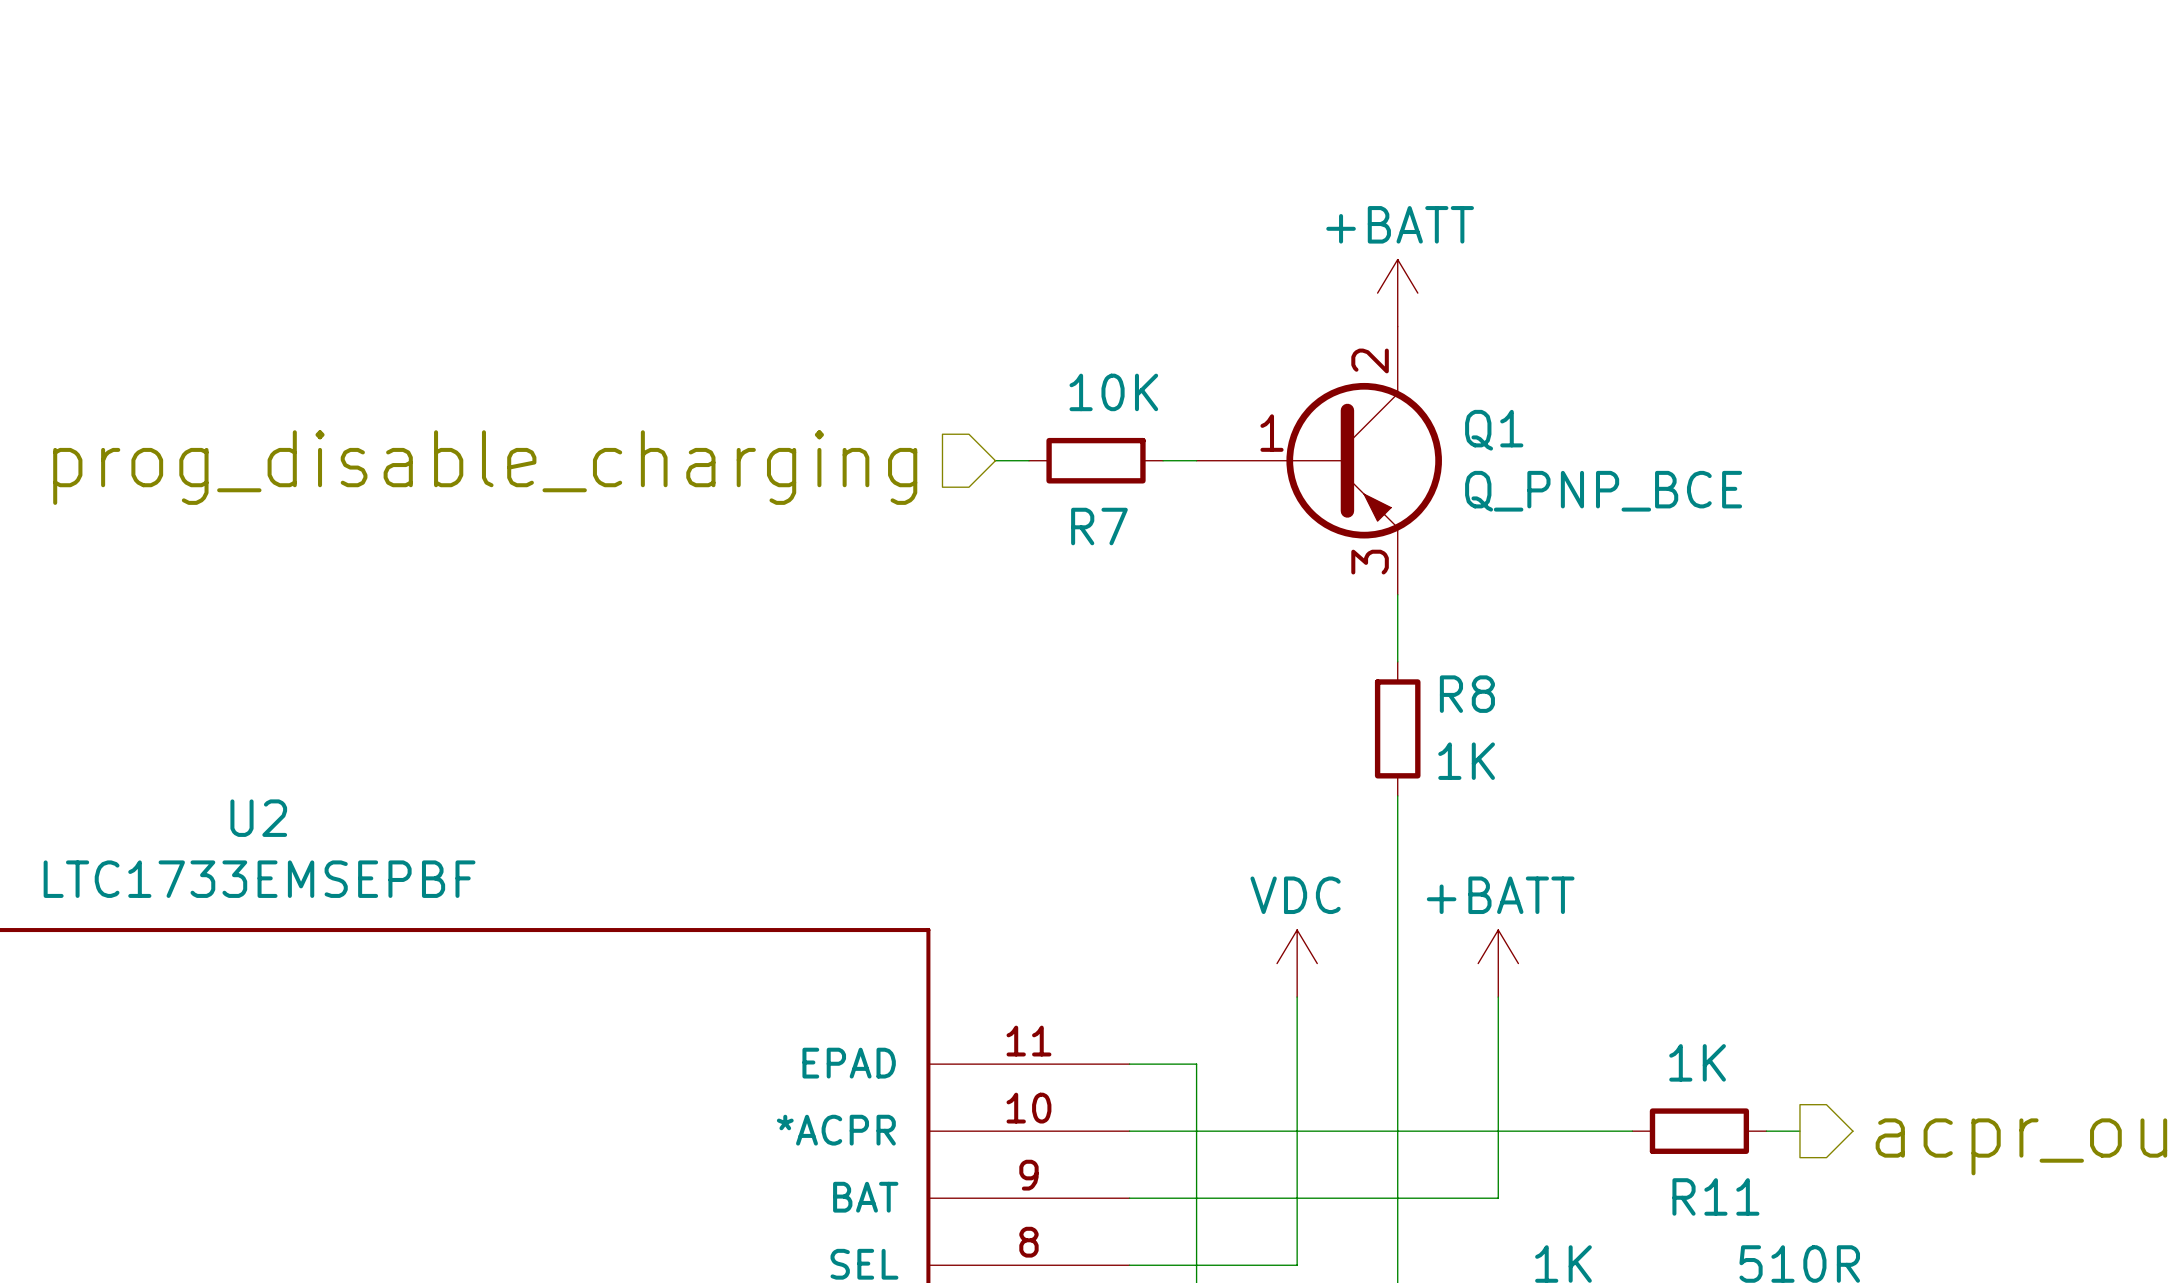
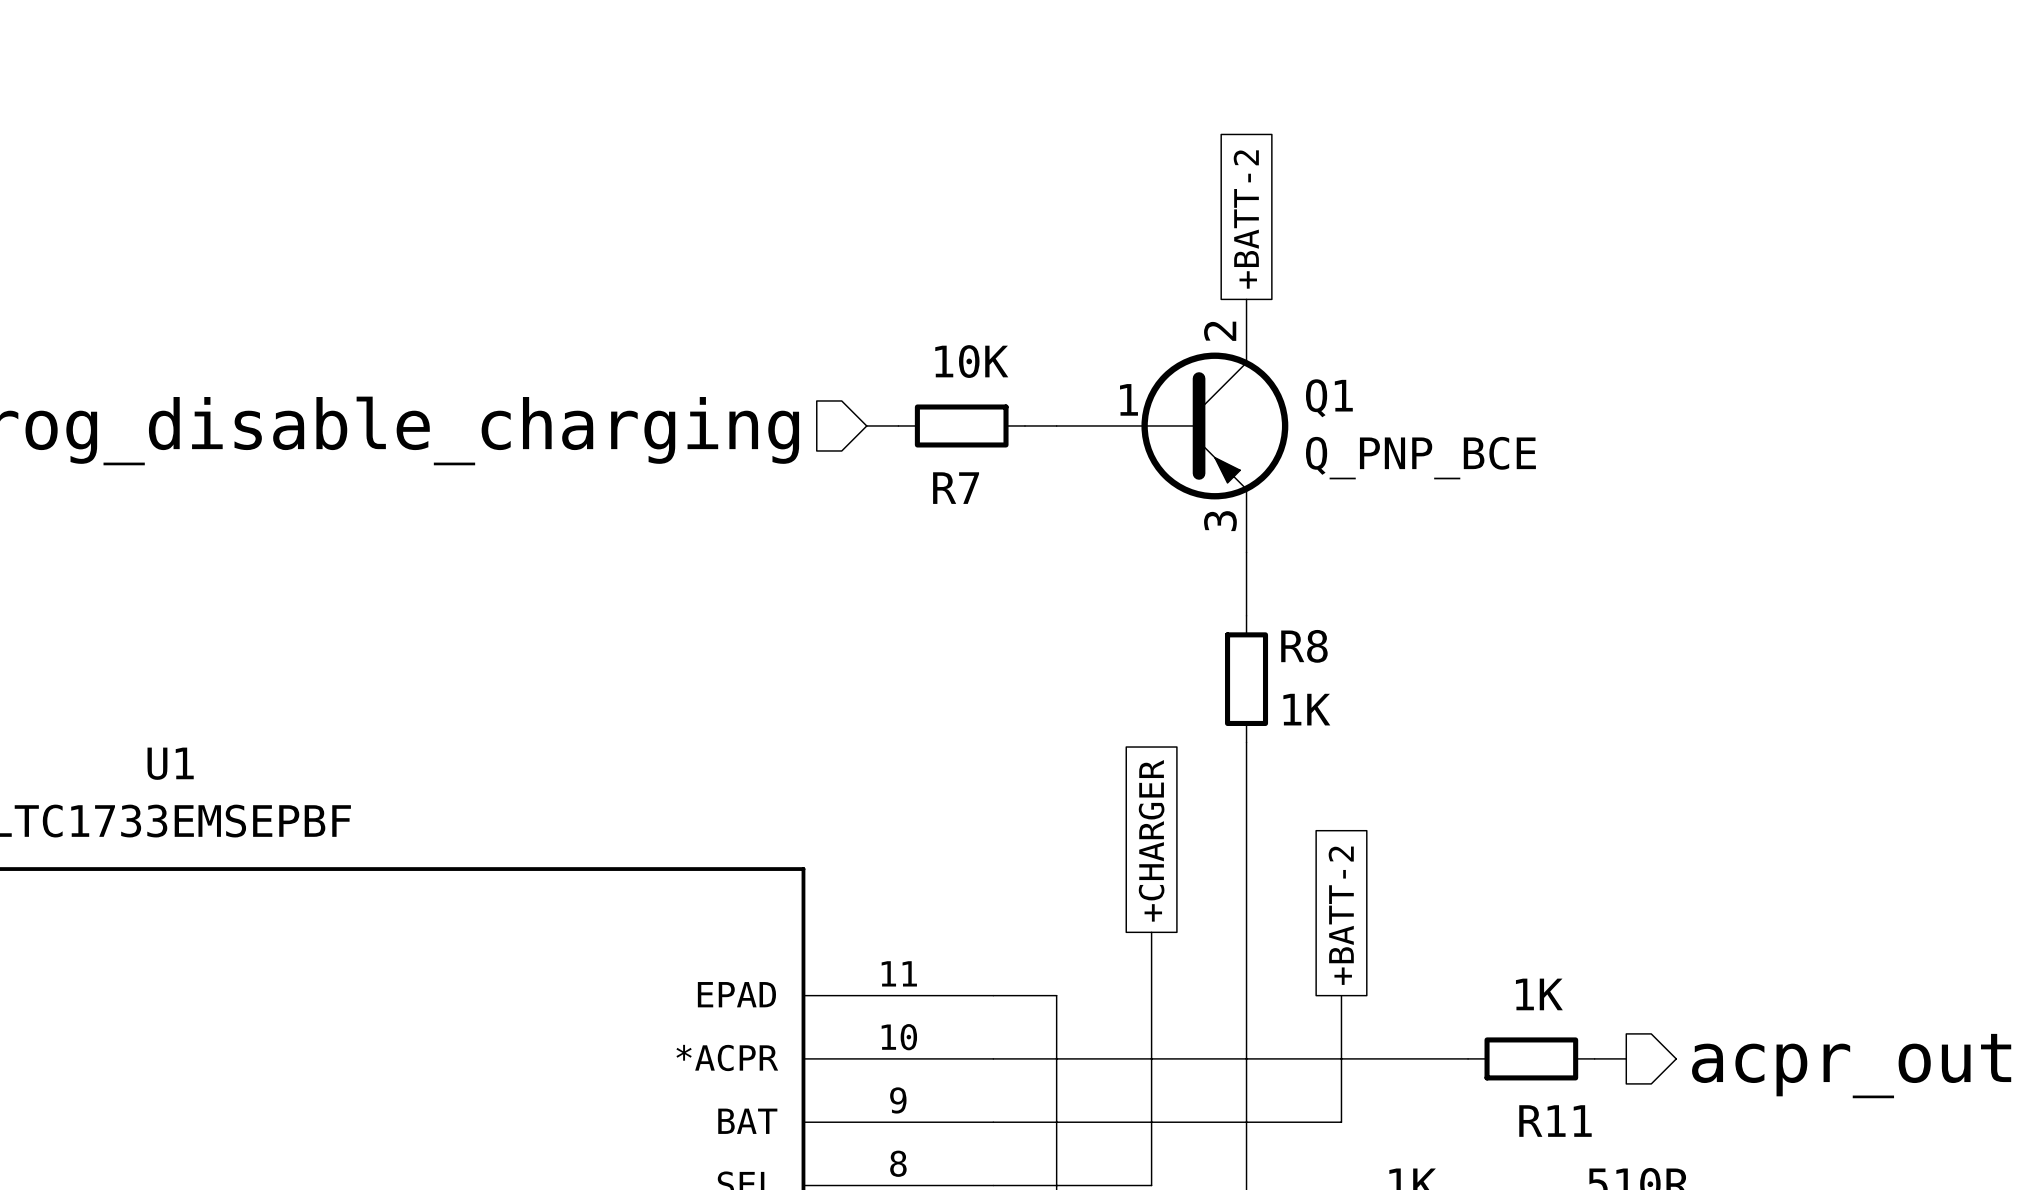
global label: none -> +BATT-2 (1246, 219)
power symbol: +BATT (1397, 293) -> none
U2 name: U2 (258, 818) -> U1 (170, 763)
global label: none -> +CHARGER (1151, 840)
global label: none -> +BATT-2 (1341, 915)
power symbol: VDC (1297, 963) -> none
power symbol: +BATT (1498, 963) -> none
wire: (1498, 997) (1498, 1064) -> none

